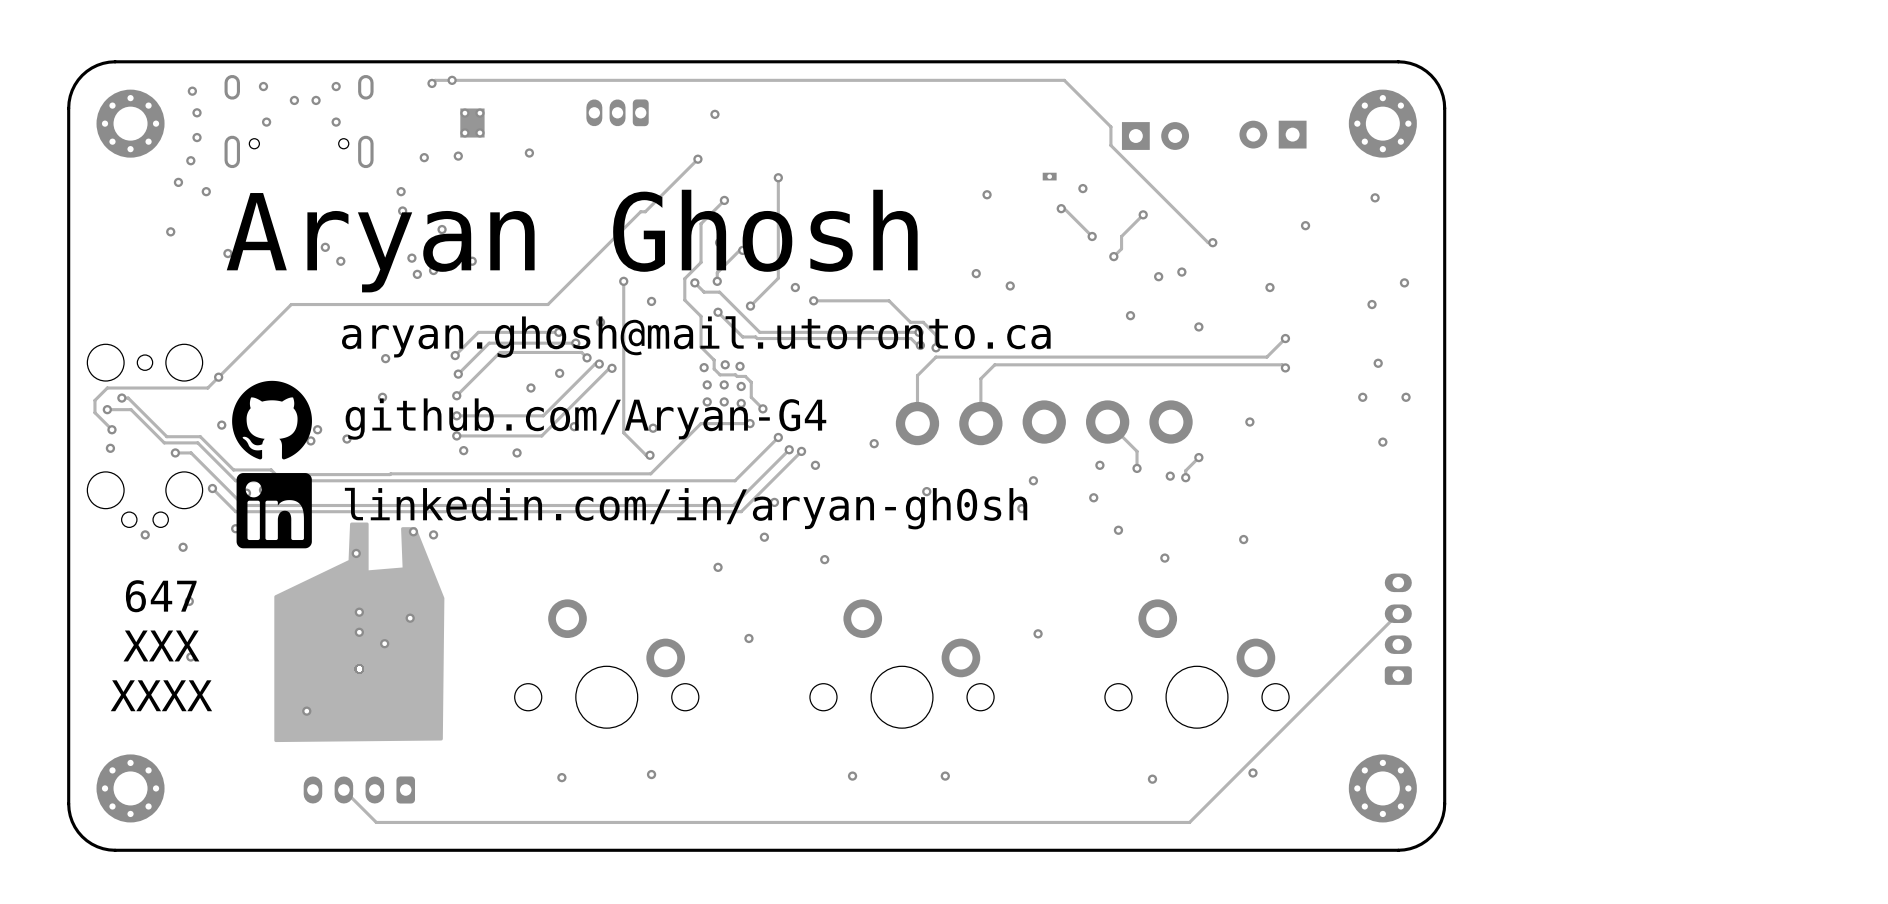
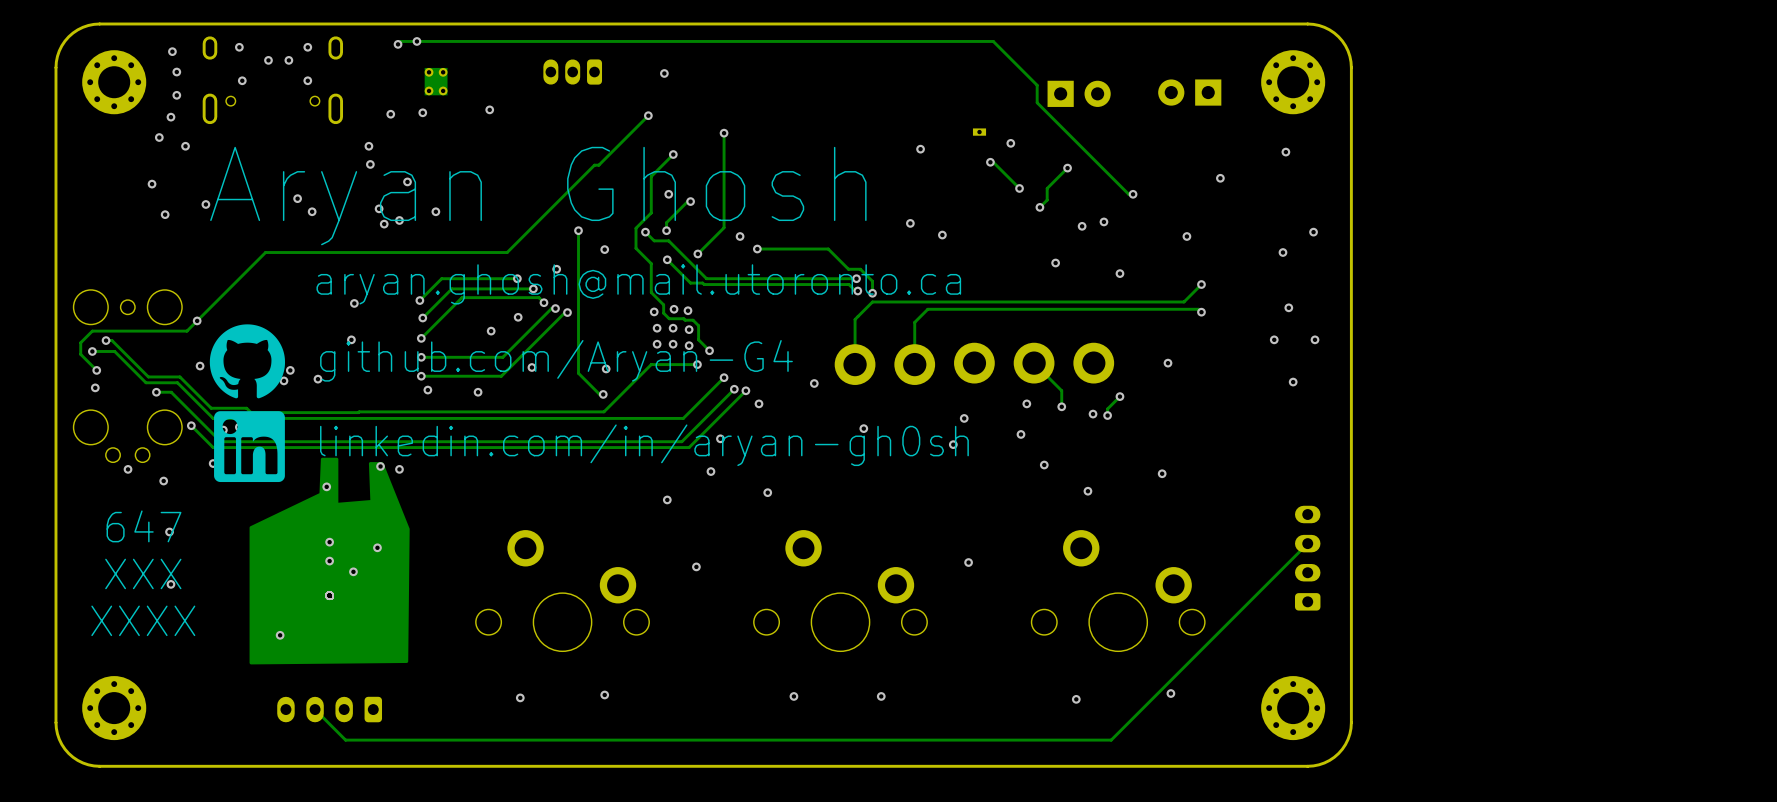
via: none -> (165, 214)

